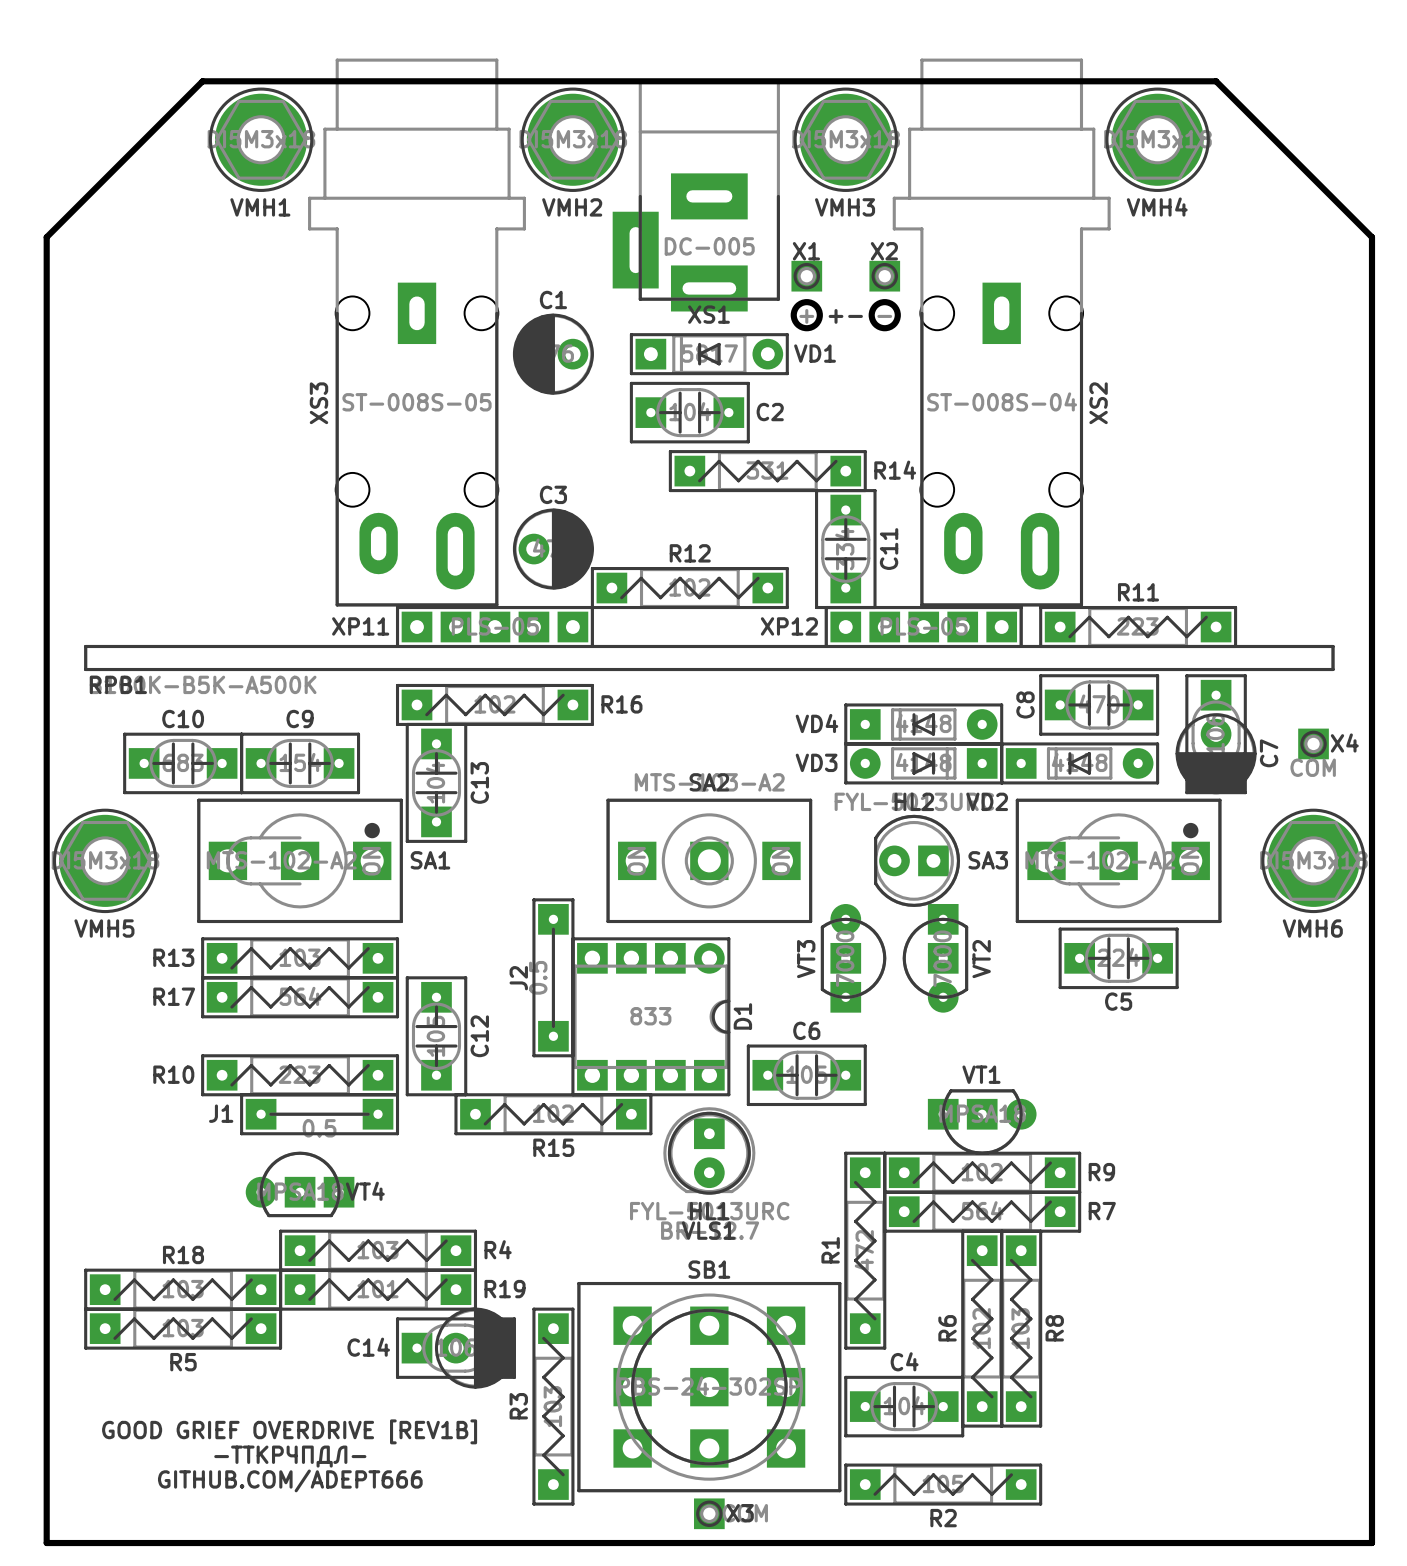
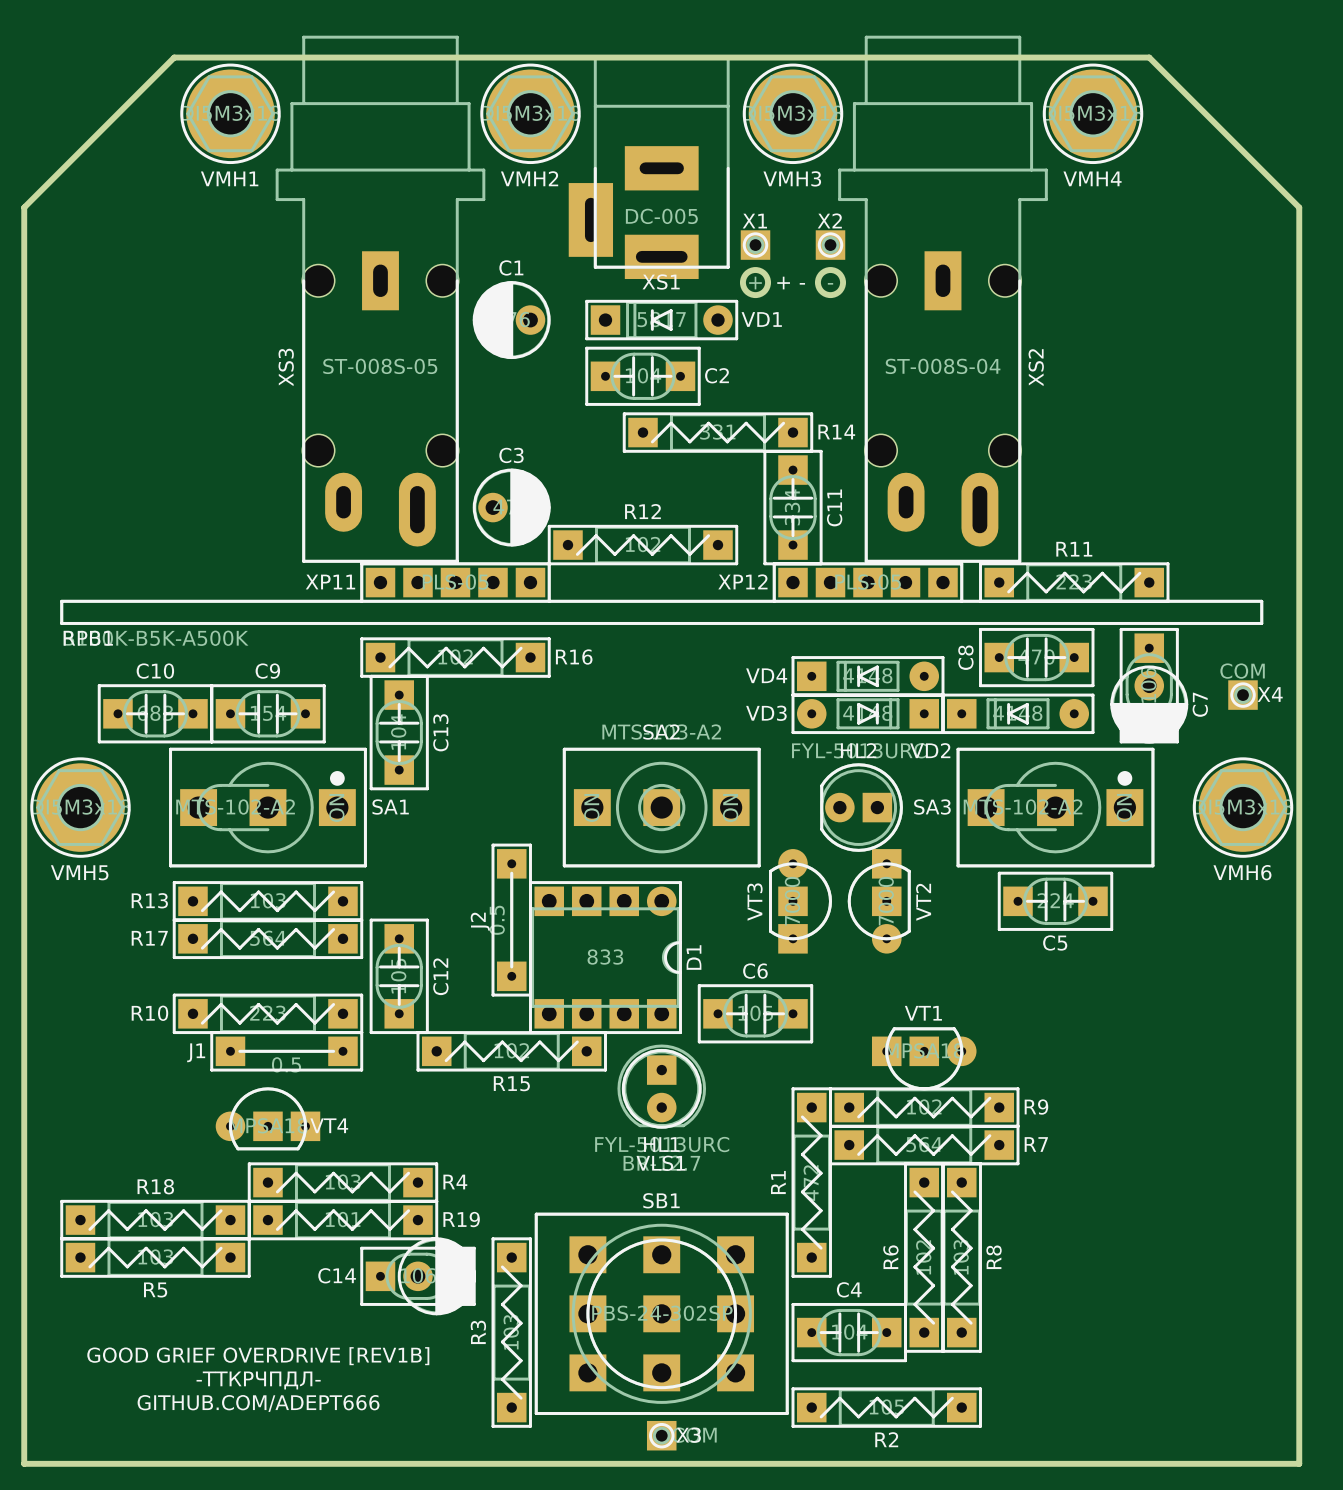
X4 value position: COM (1313, 767) -> COM (1242, 671)

